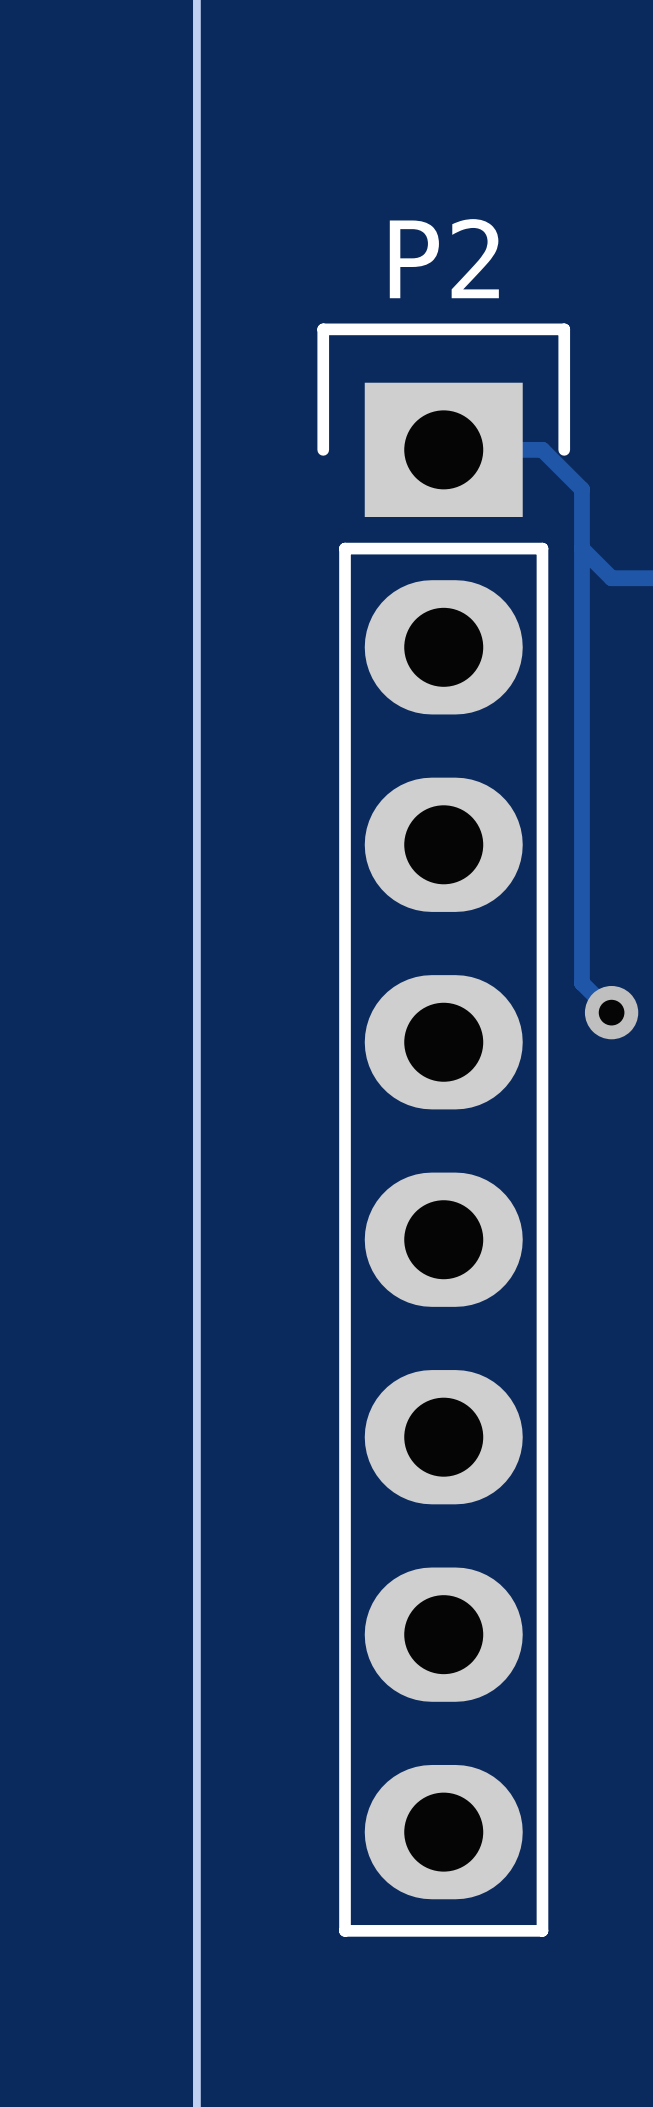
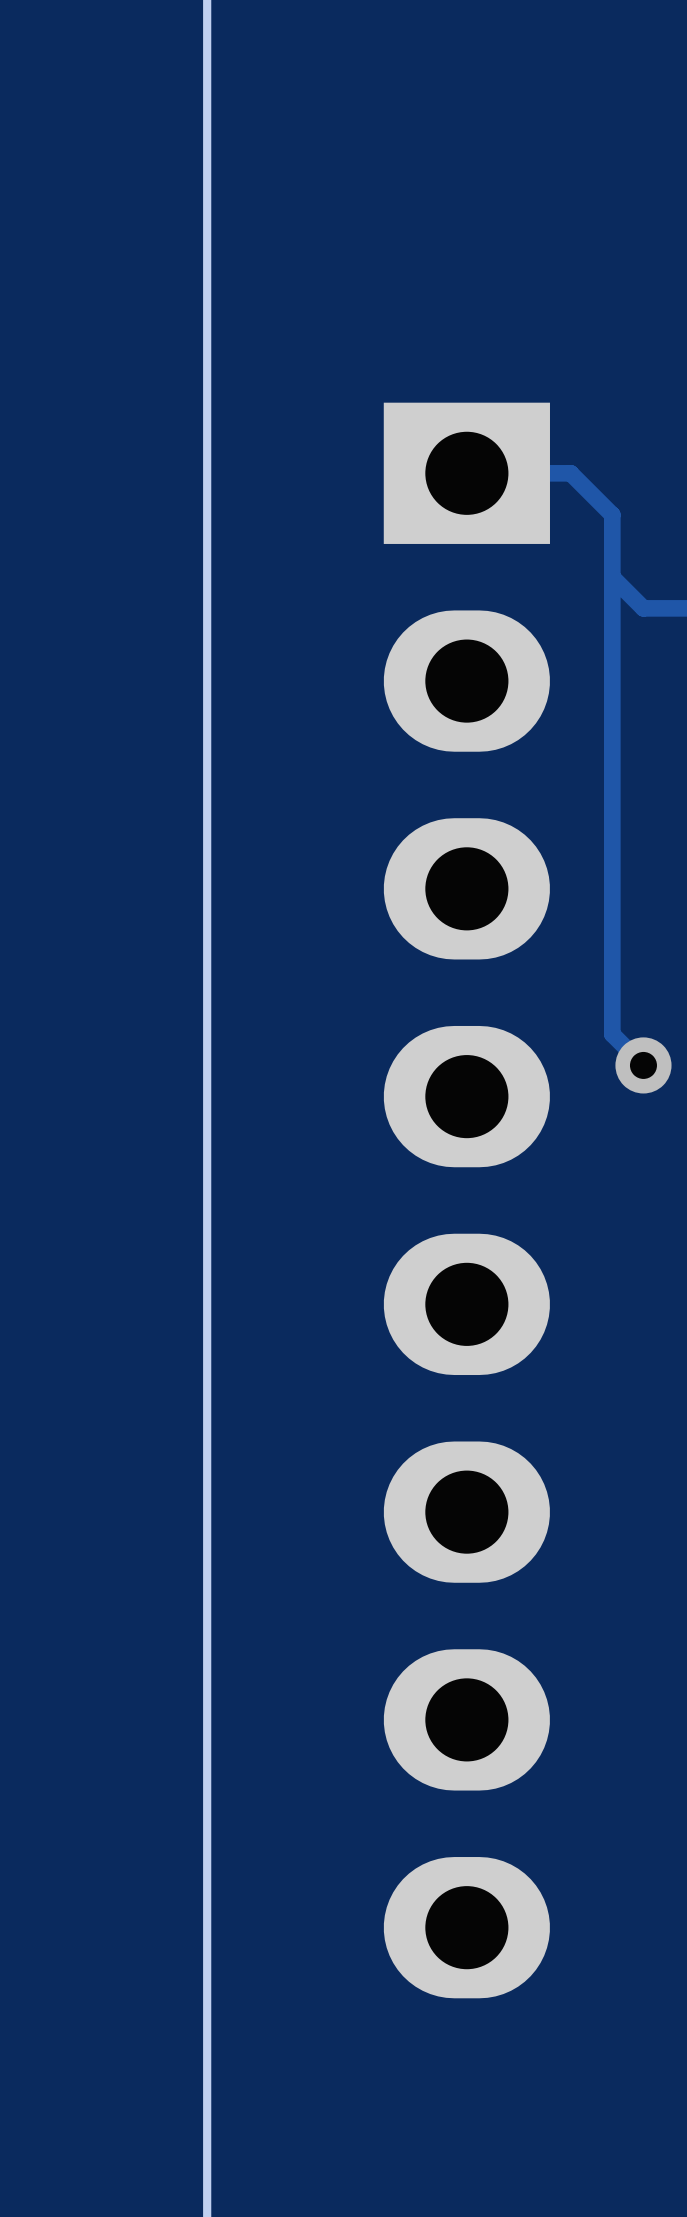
P2 side: bottom (443, 1130) -> top (466, 1200)

